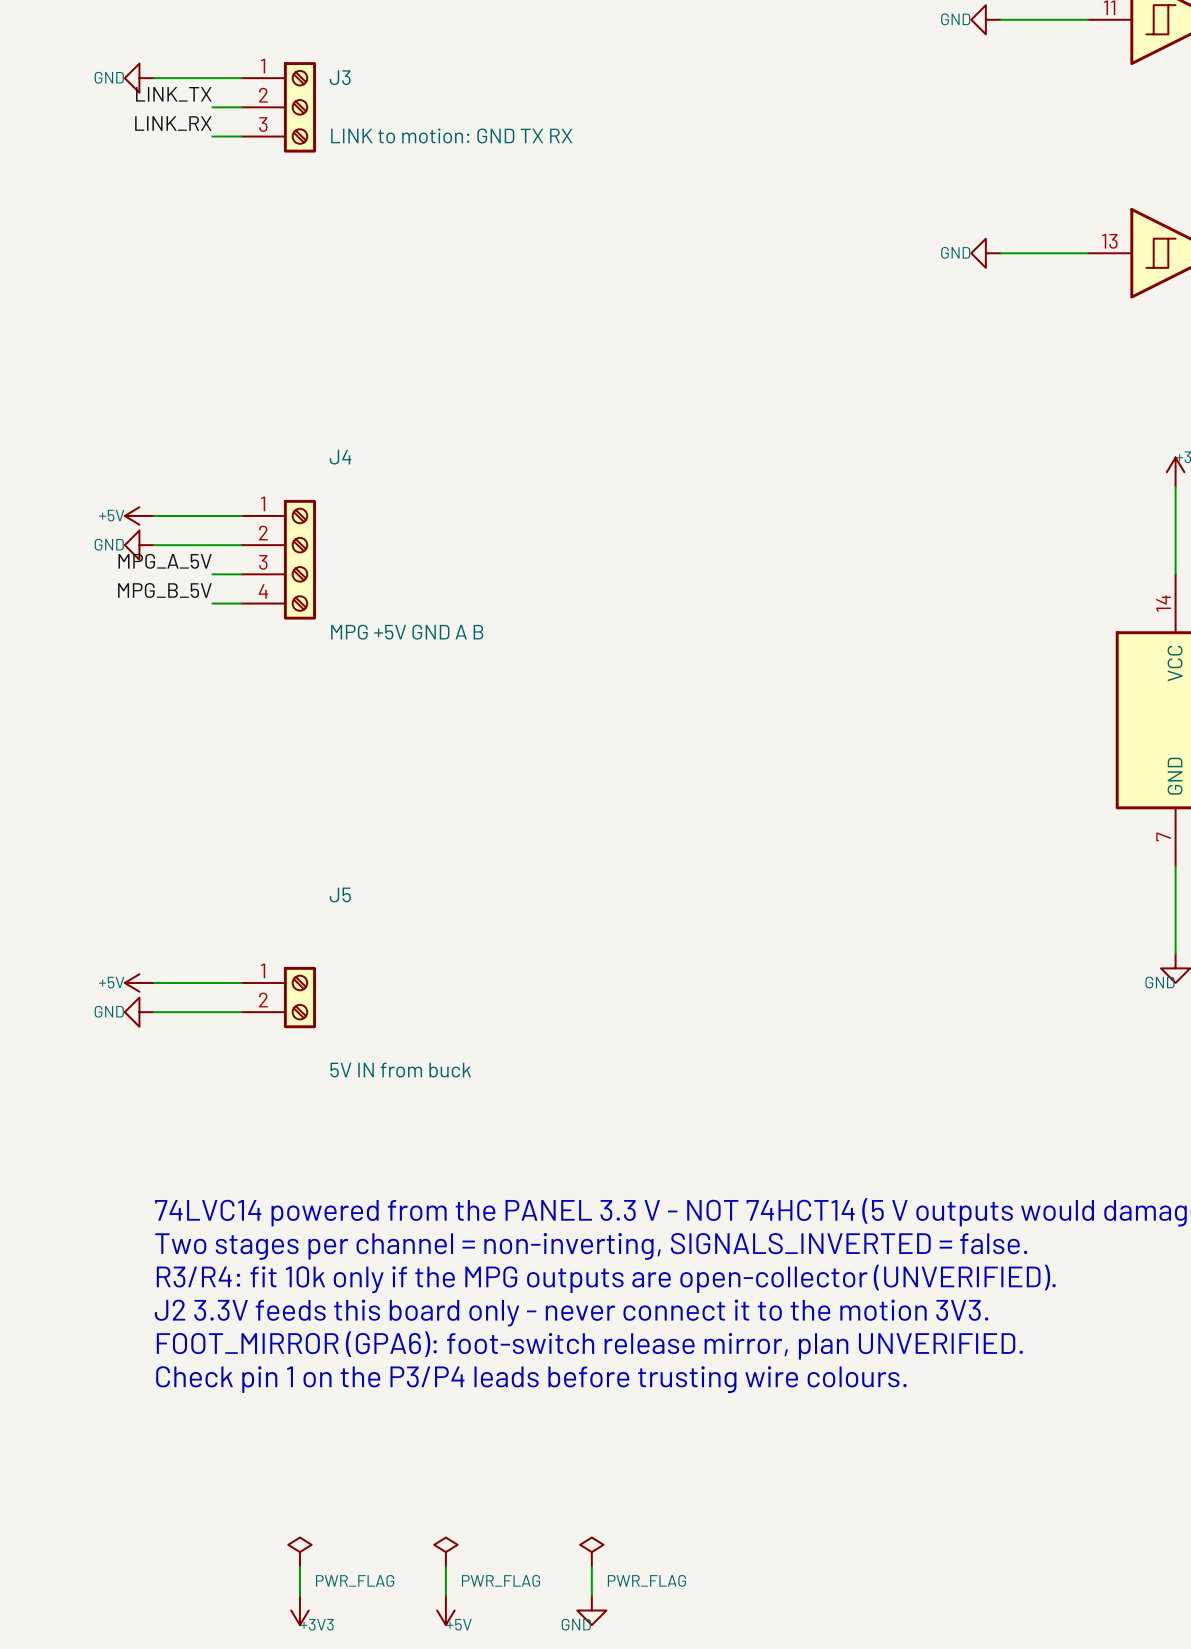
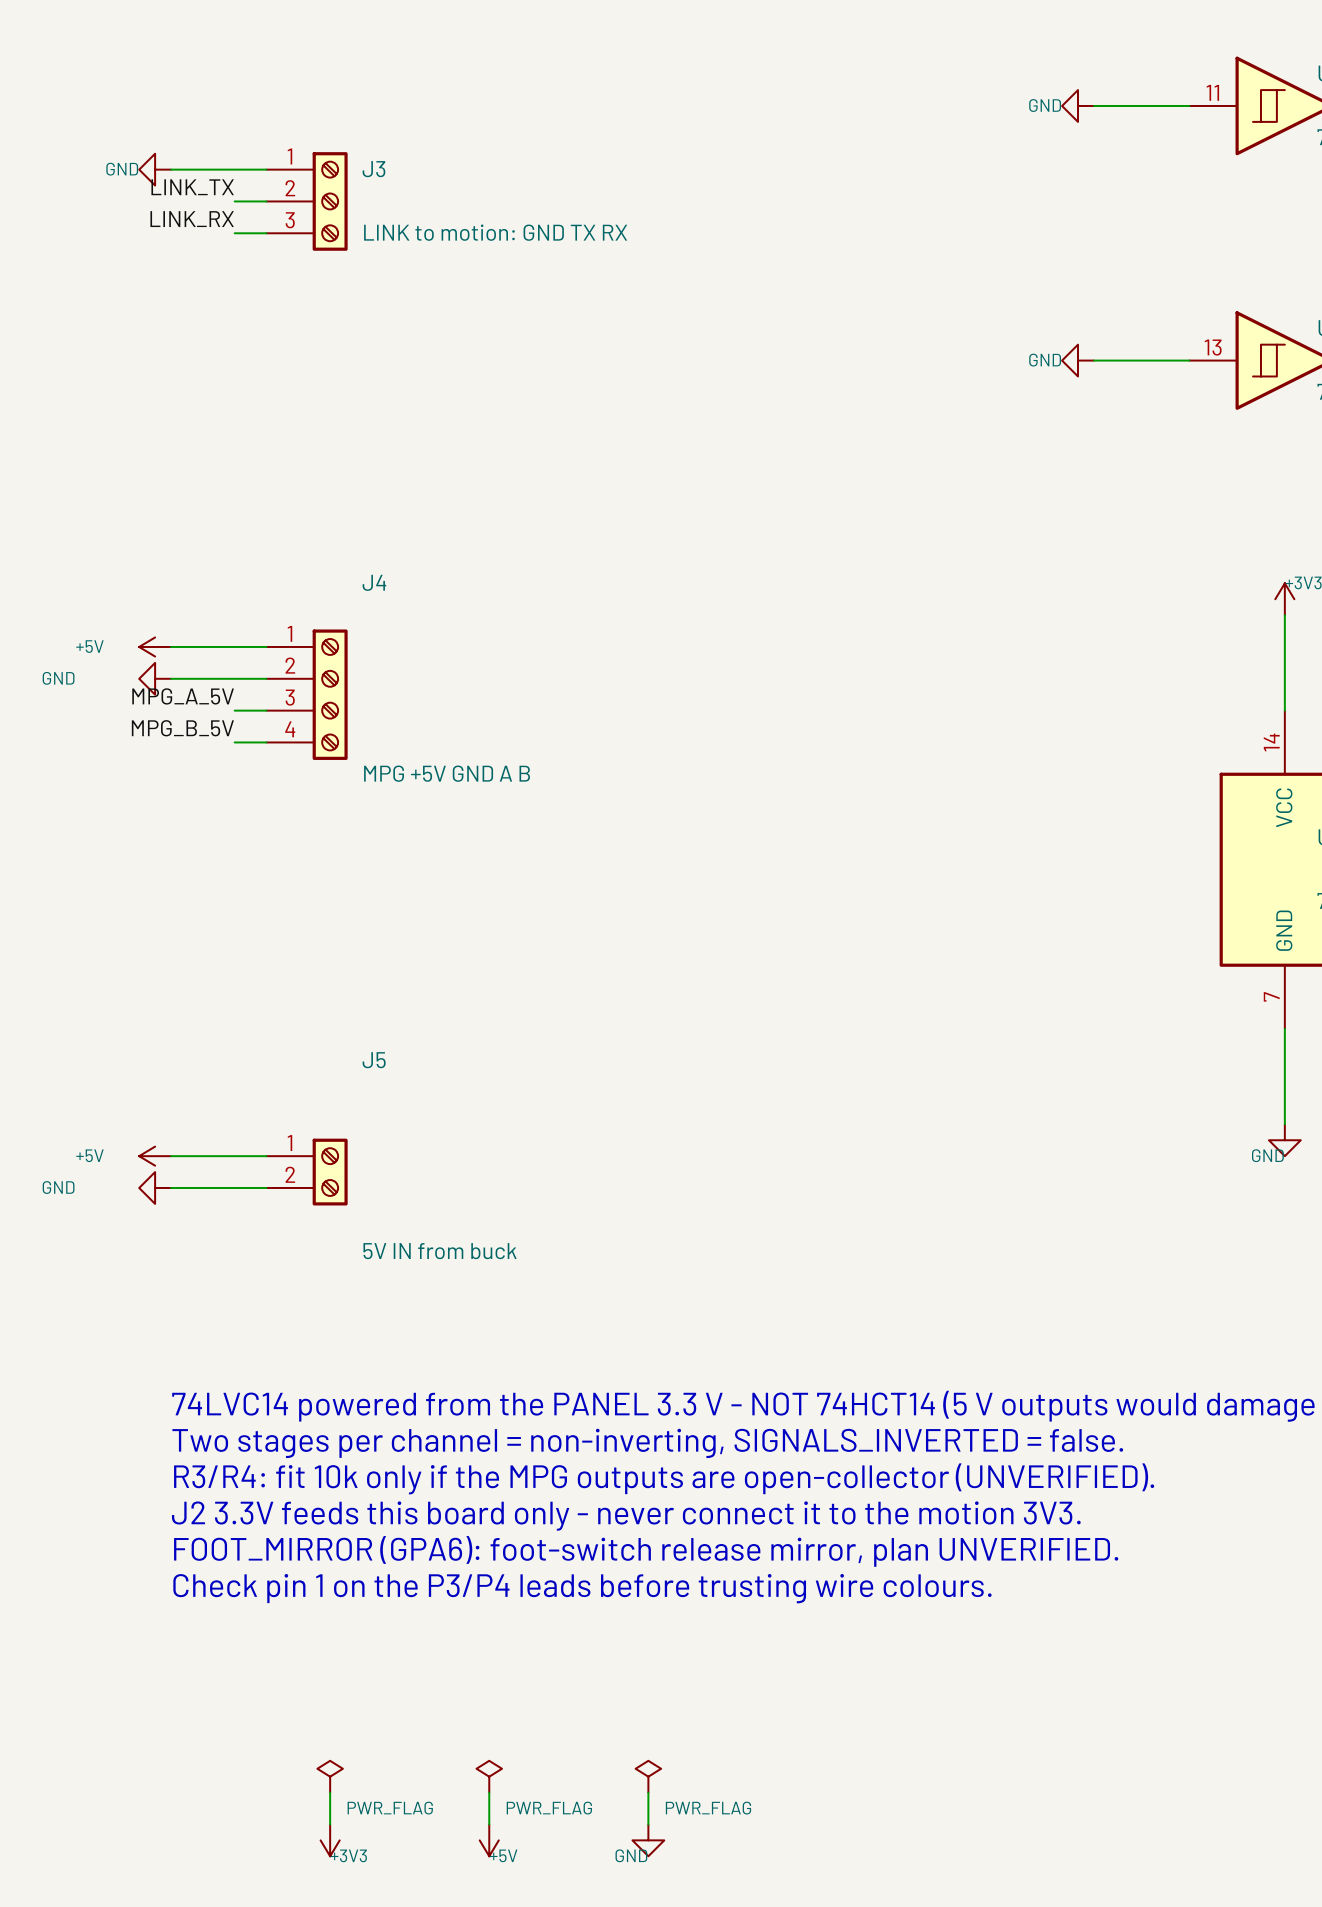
power symbol text position: +5V (111, 515) -> +5V (89, 646)
power symbol text position: GND (109, 544) -> GND (58, 678)
power symbol text position: +5V (111, 982) -> +5V (89, 1155)
power symbol text position: GND (109, 1011) -> GND (58, 1187)

